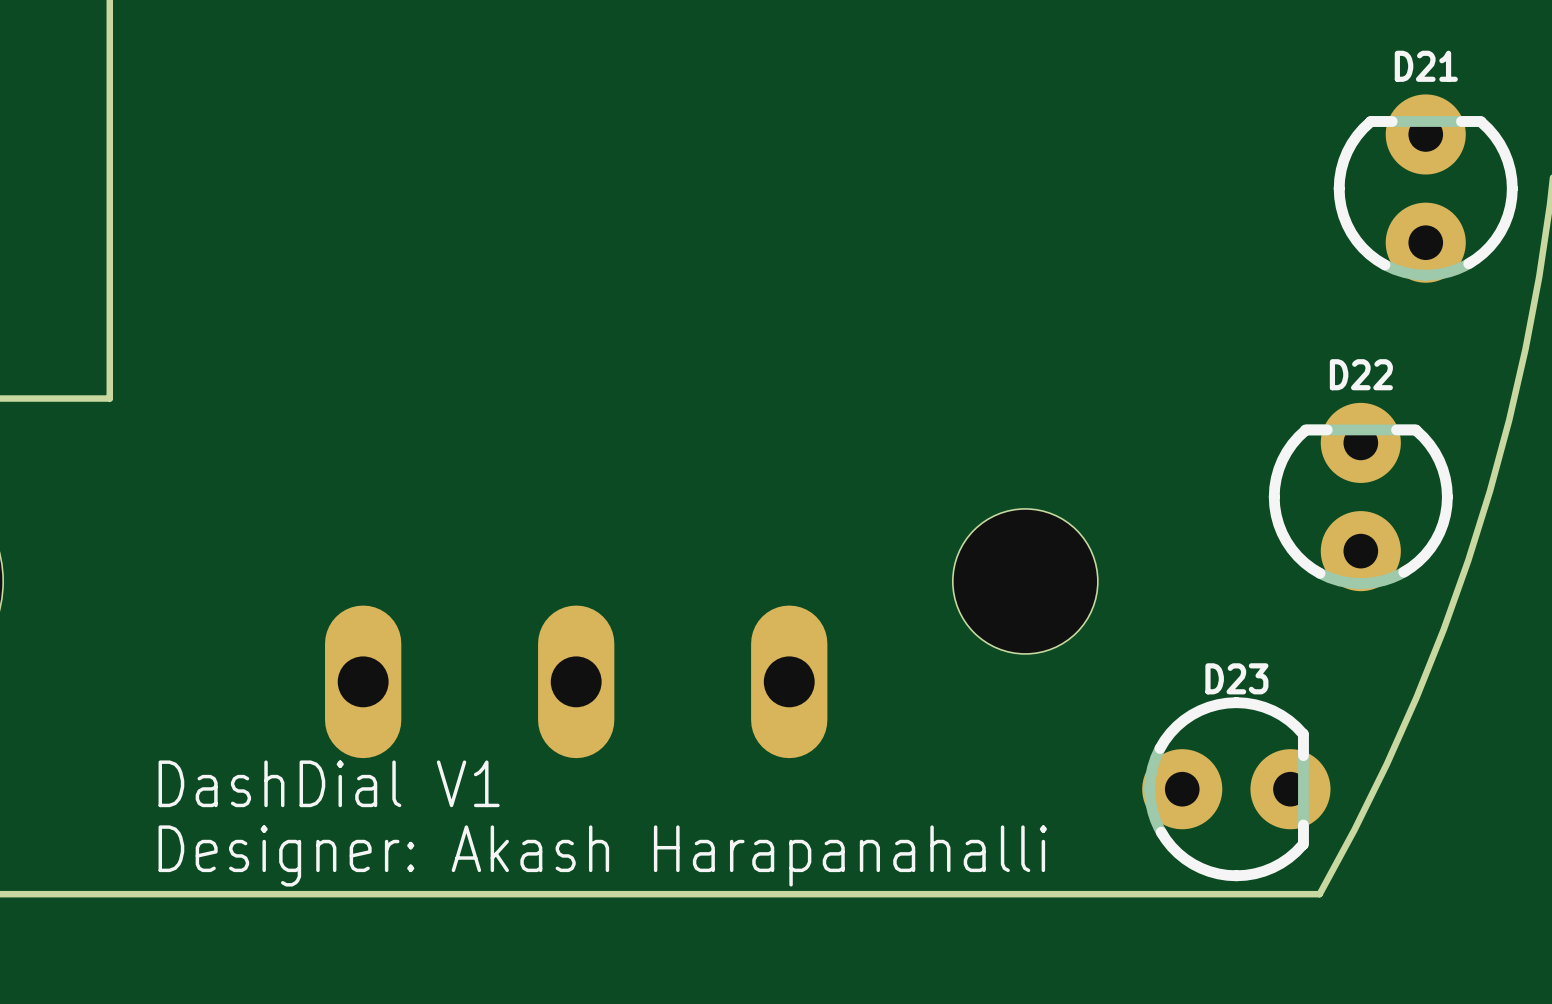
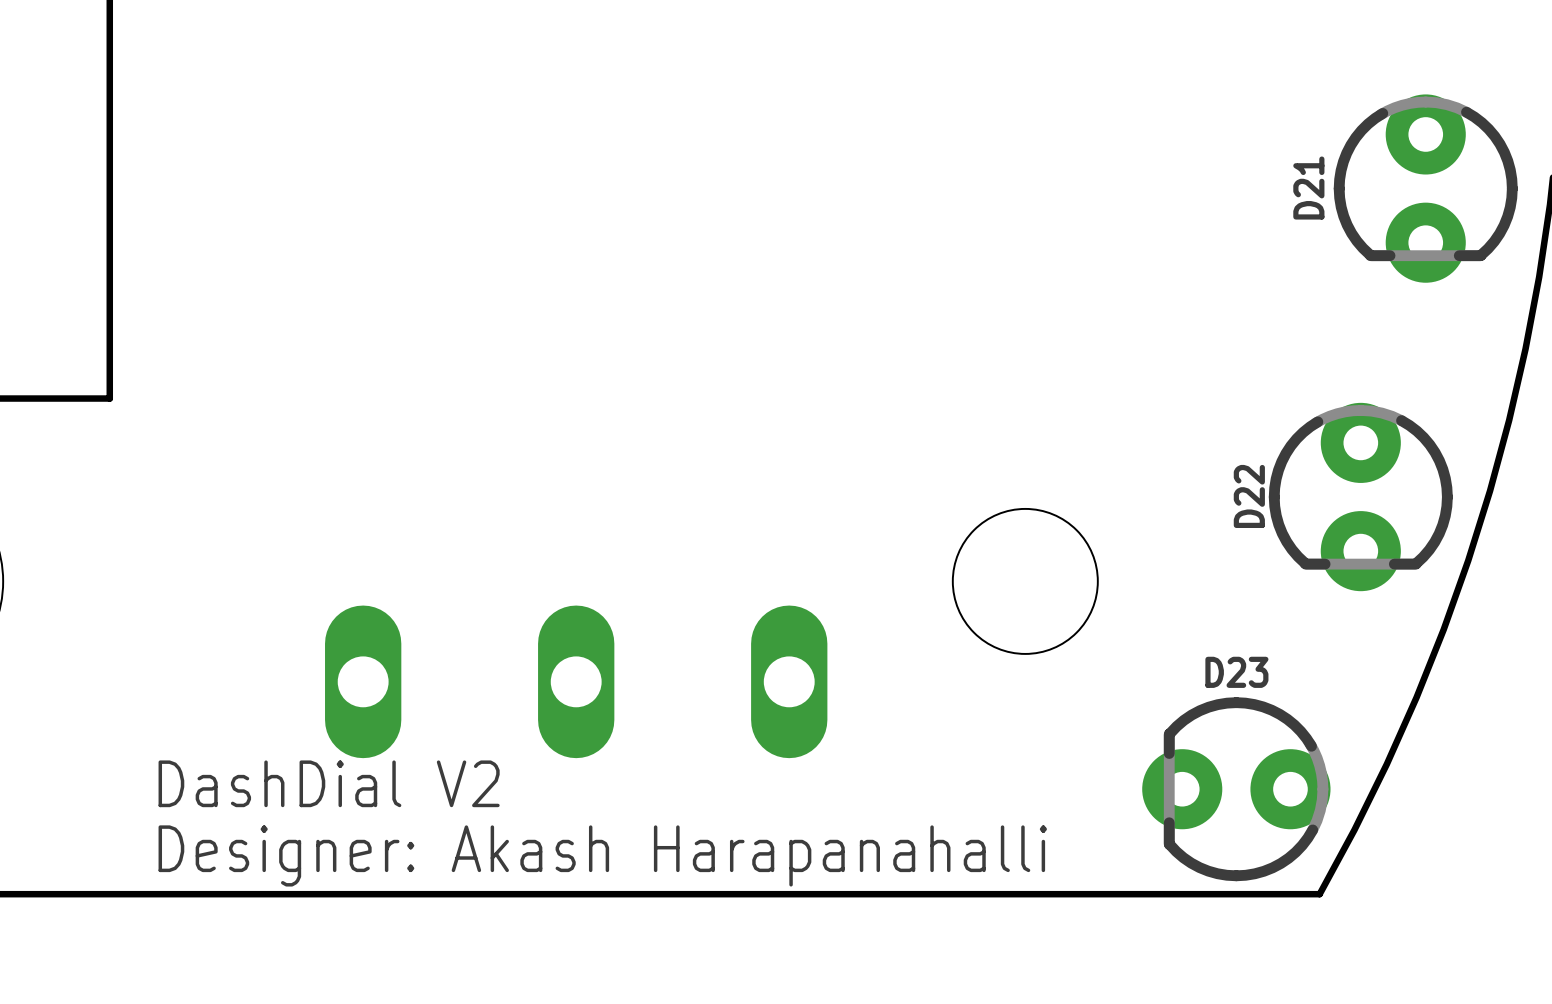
D21 name position: D21 (1426, 66) -> D21 (1308, 188)
D21 rotation: 0° (1425, 188) -> 180° (1425, 188)
D22 name position: D22 (1361, 374) -> D22 (1249, 496)
D22 rotation: 0° (1360, 497) -> 180° (1360, 497)
text: DashDial V1 (329, 783) -> DashDial V2 (329, 783)
D23 rotation: 0° (1236, 789) -> 180° (1236, 789)

